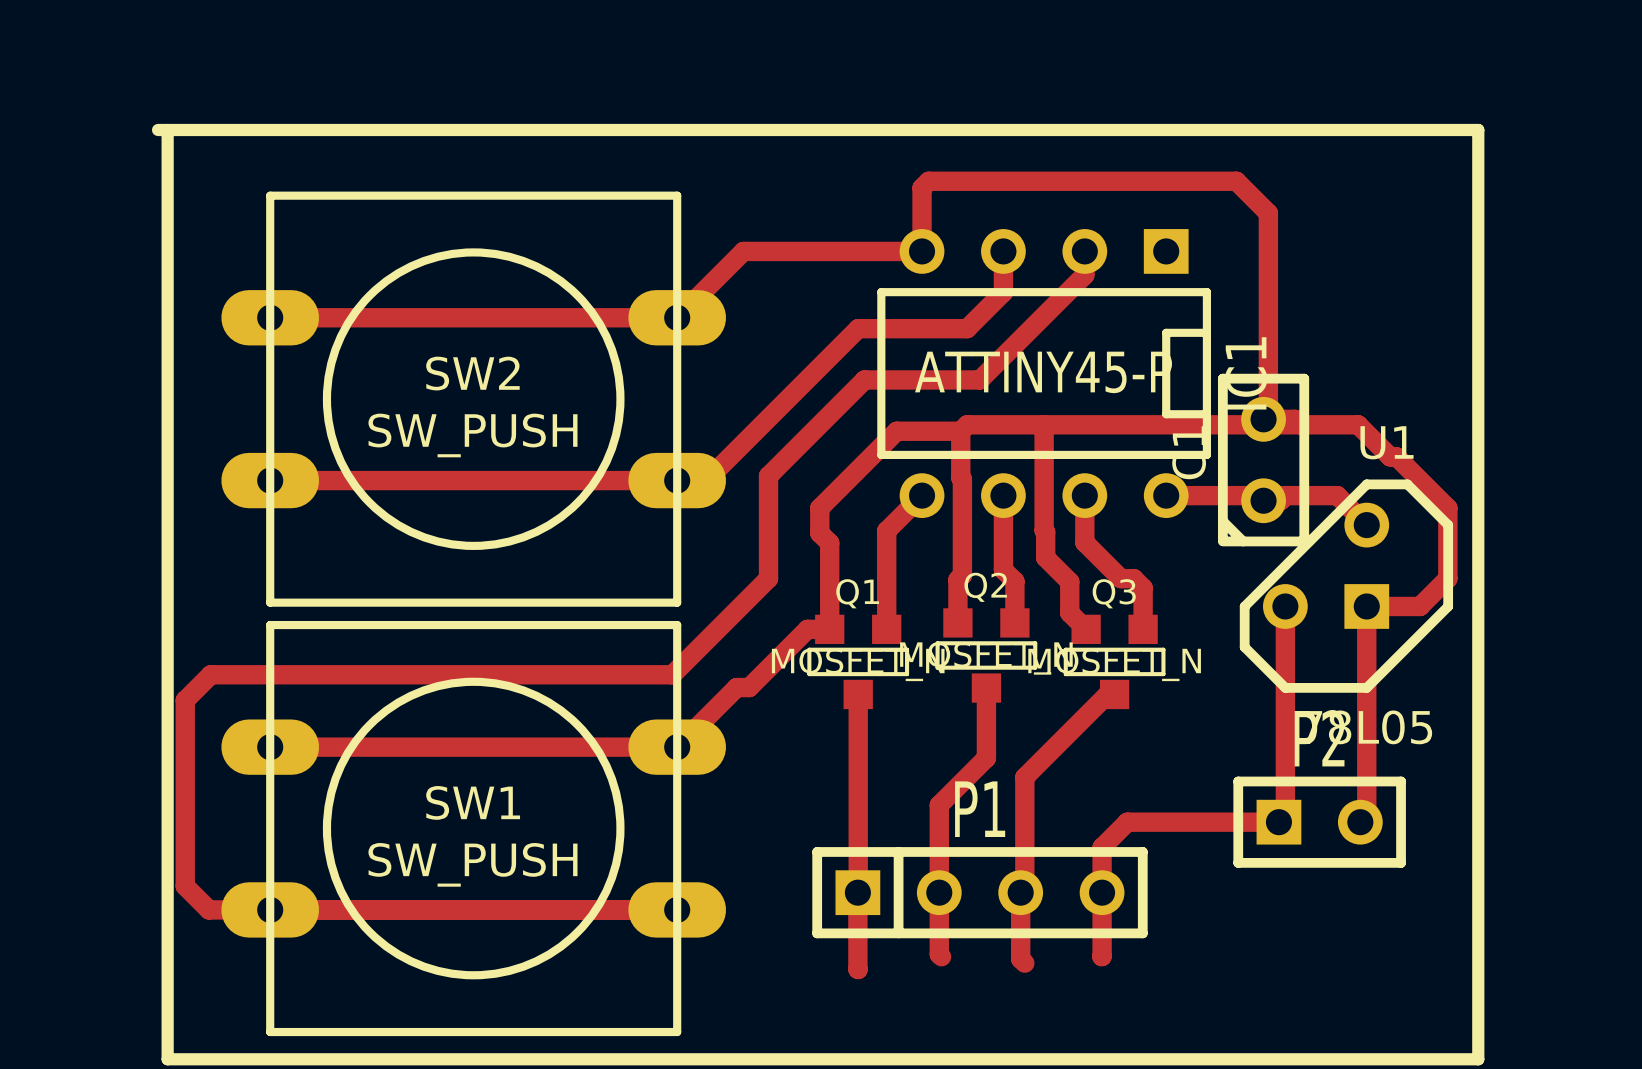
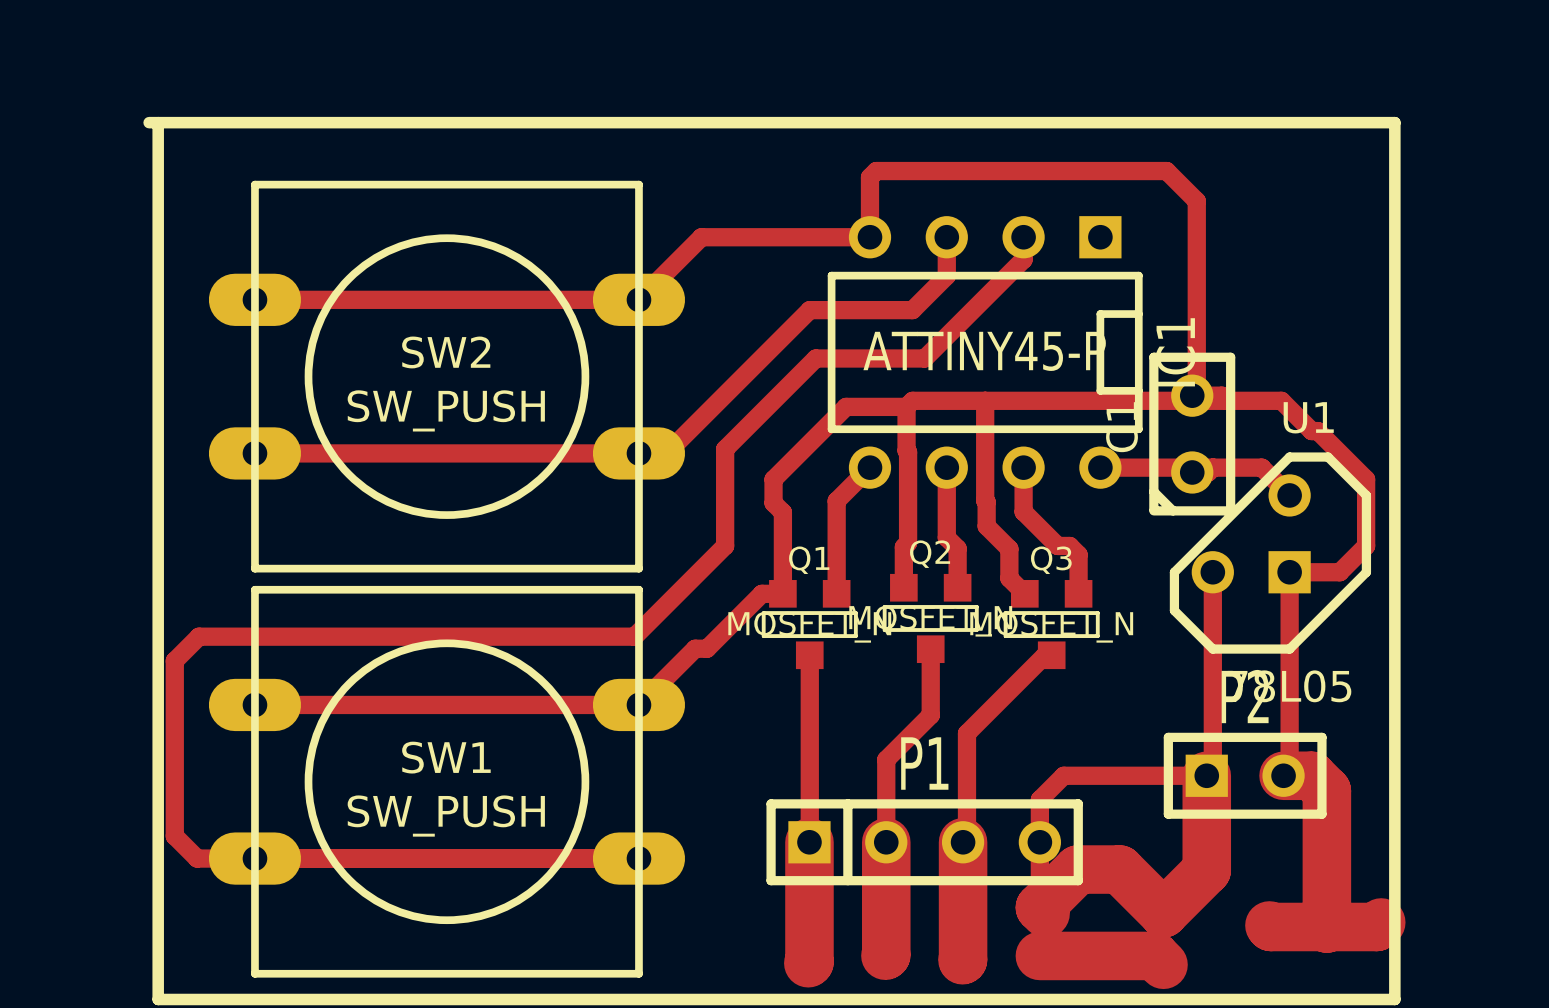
top track: none -> (1206, 775) (1206, 870) (1163, 913) (1119, 869) (1077, 869) (1039, 907) (1045, 913)
top track: none -> (1283, 775) (1311, 775) (1326, 790) (1326, 928) (1325, 926)
top track: none -> (809, 842) (808, 963)
top track: none -> (886, 842) (885, 955)
top track: none -> (963, 842) (962, 960)
top track: none -> (1381, 922) (1376, 926) (1270, 926) (1269, 925)
top track: none -> (1039, 955) (1154, 955) (1163, 964)

